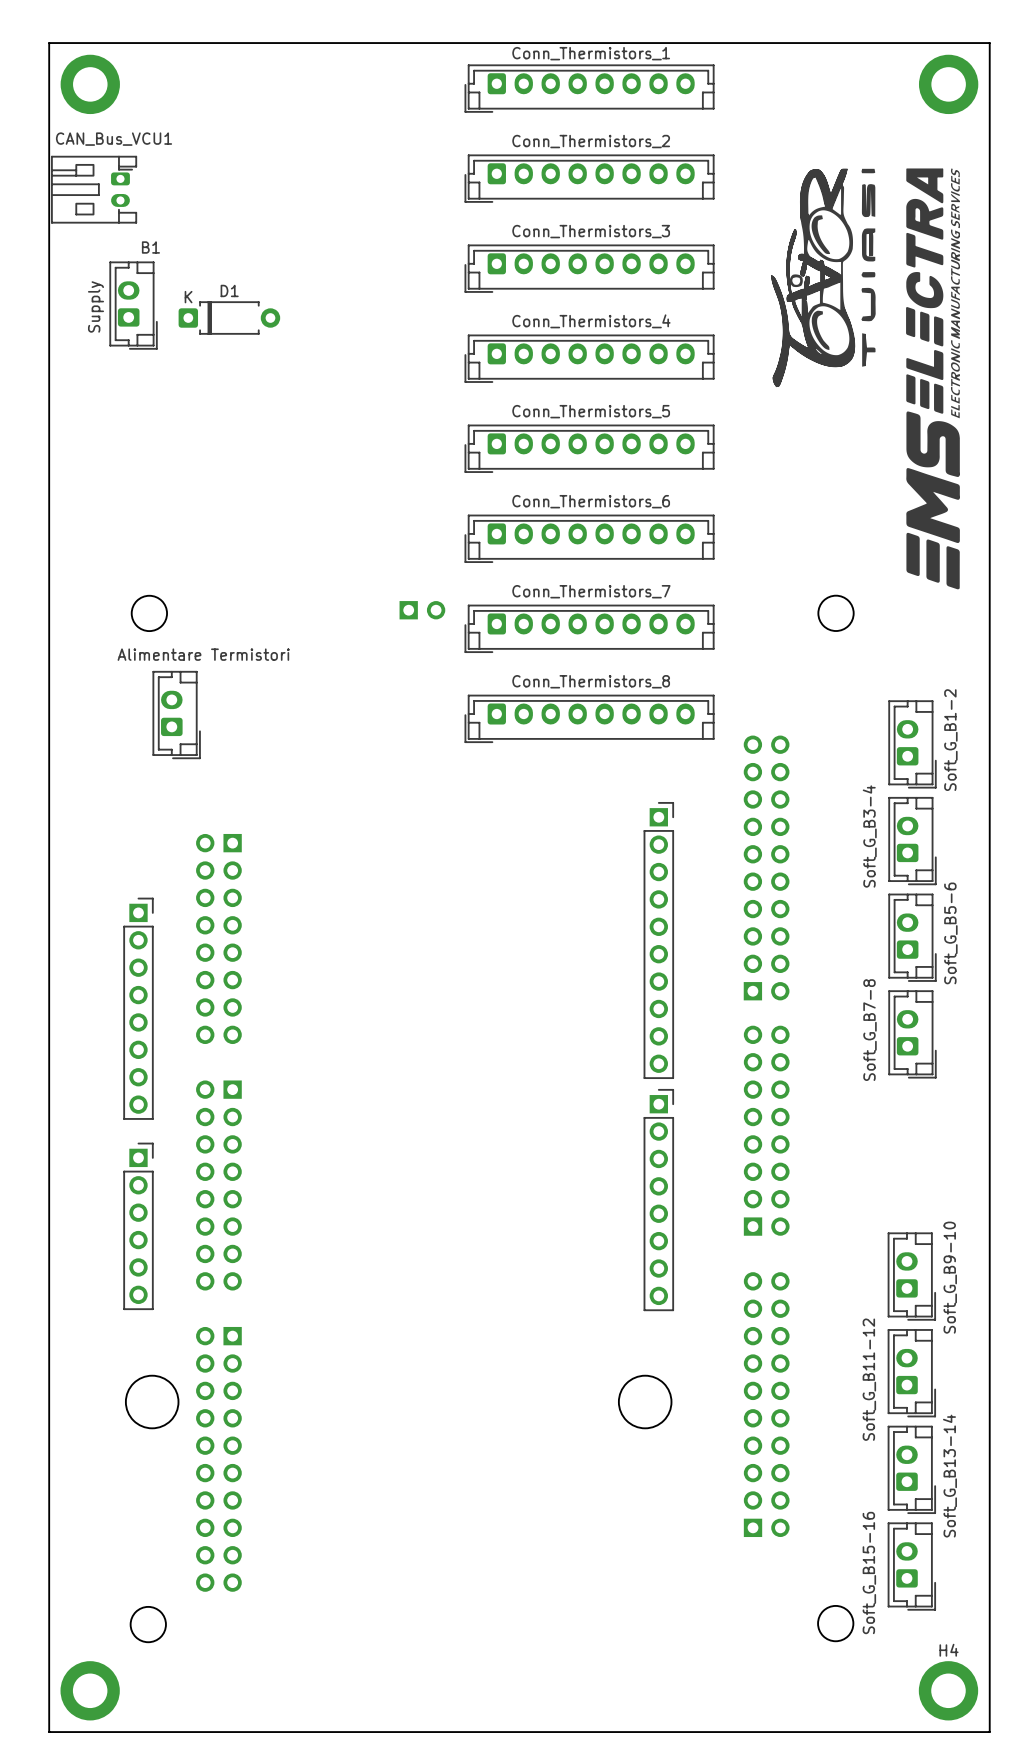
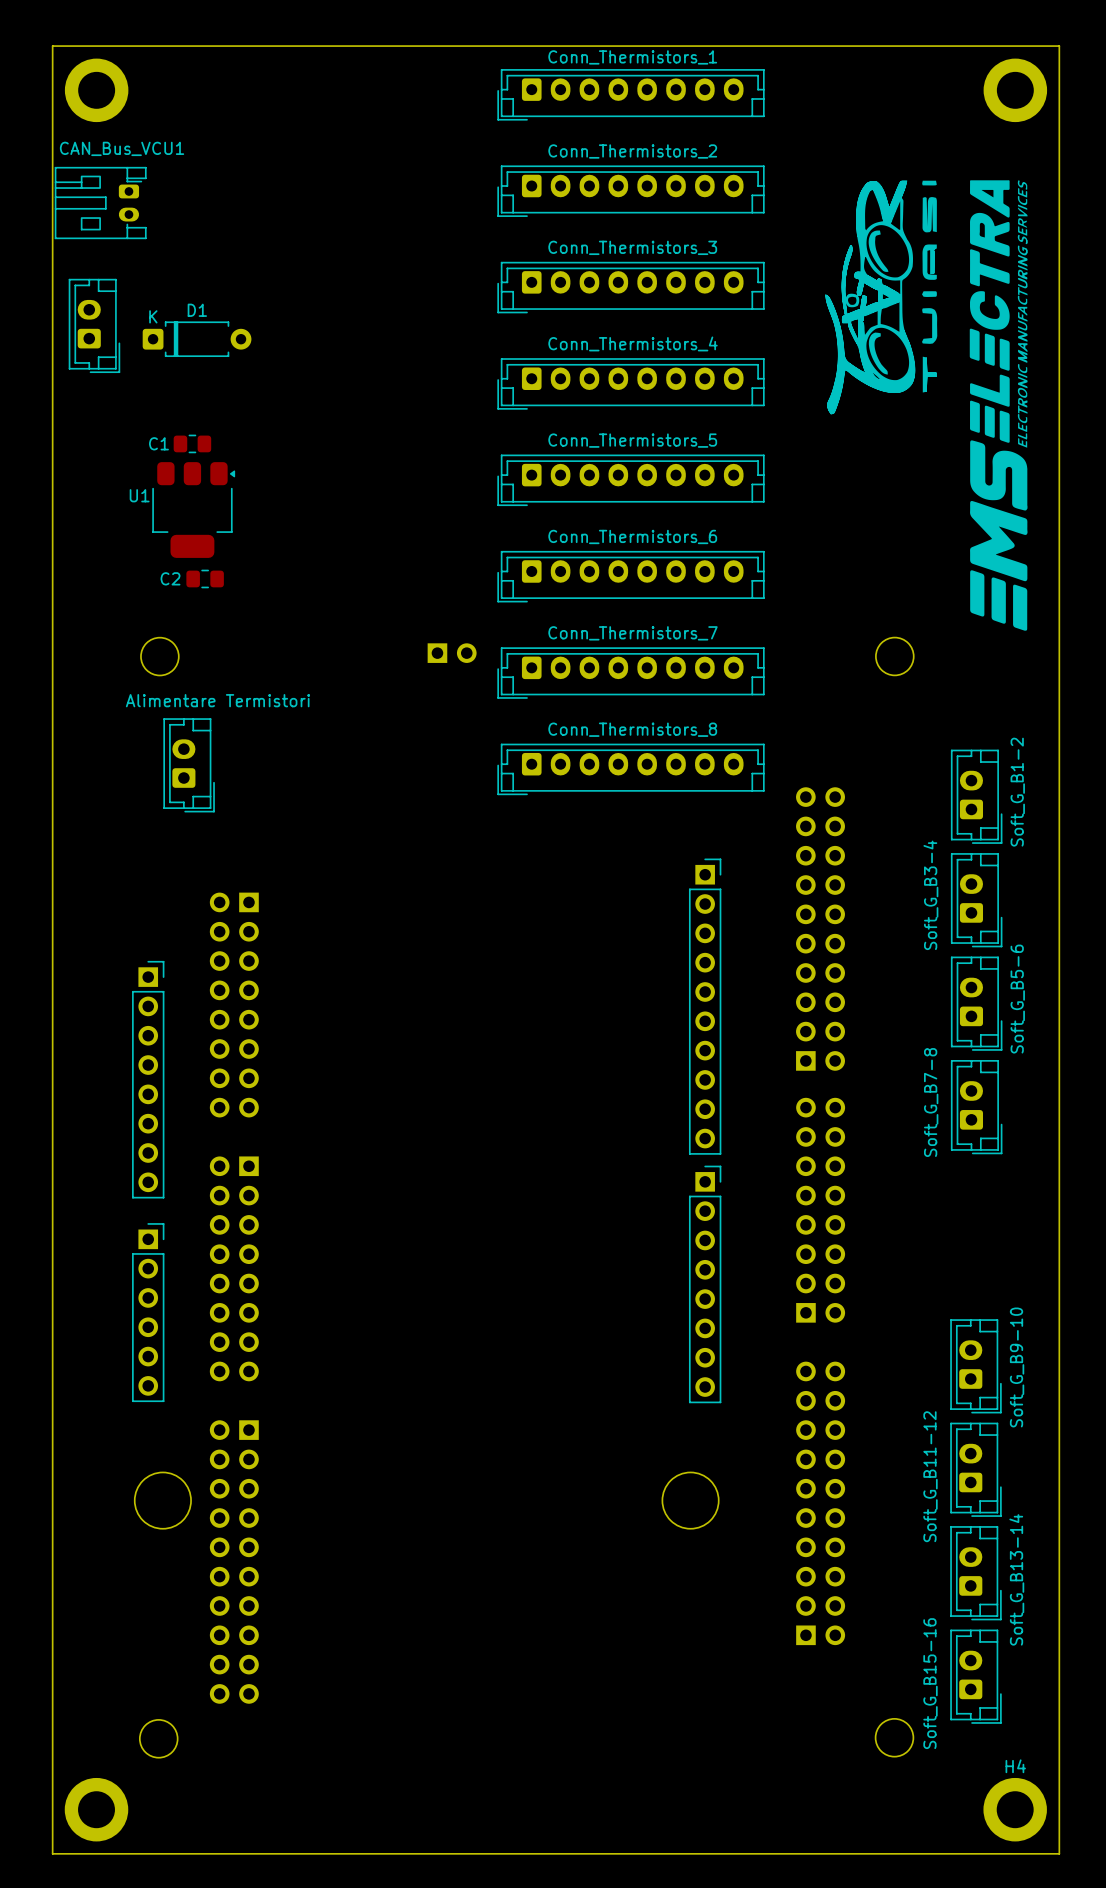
part: none -> (94, 325)
B1: Supply (133, 305) -> none
D1 position: (229, 318) -> (197, 339)
C1: none -> (192, 443)
U1: none -> (193, 510)
C2: none -> (205, 578)

